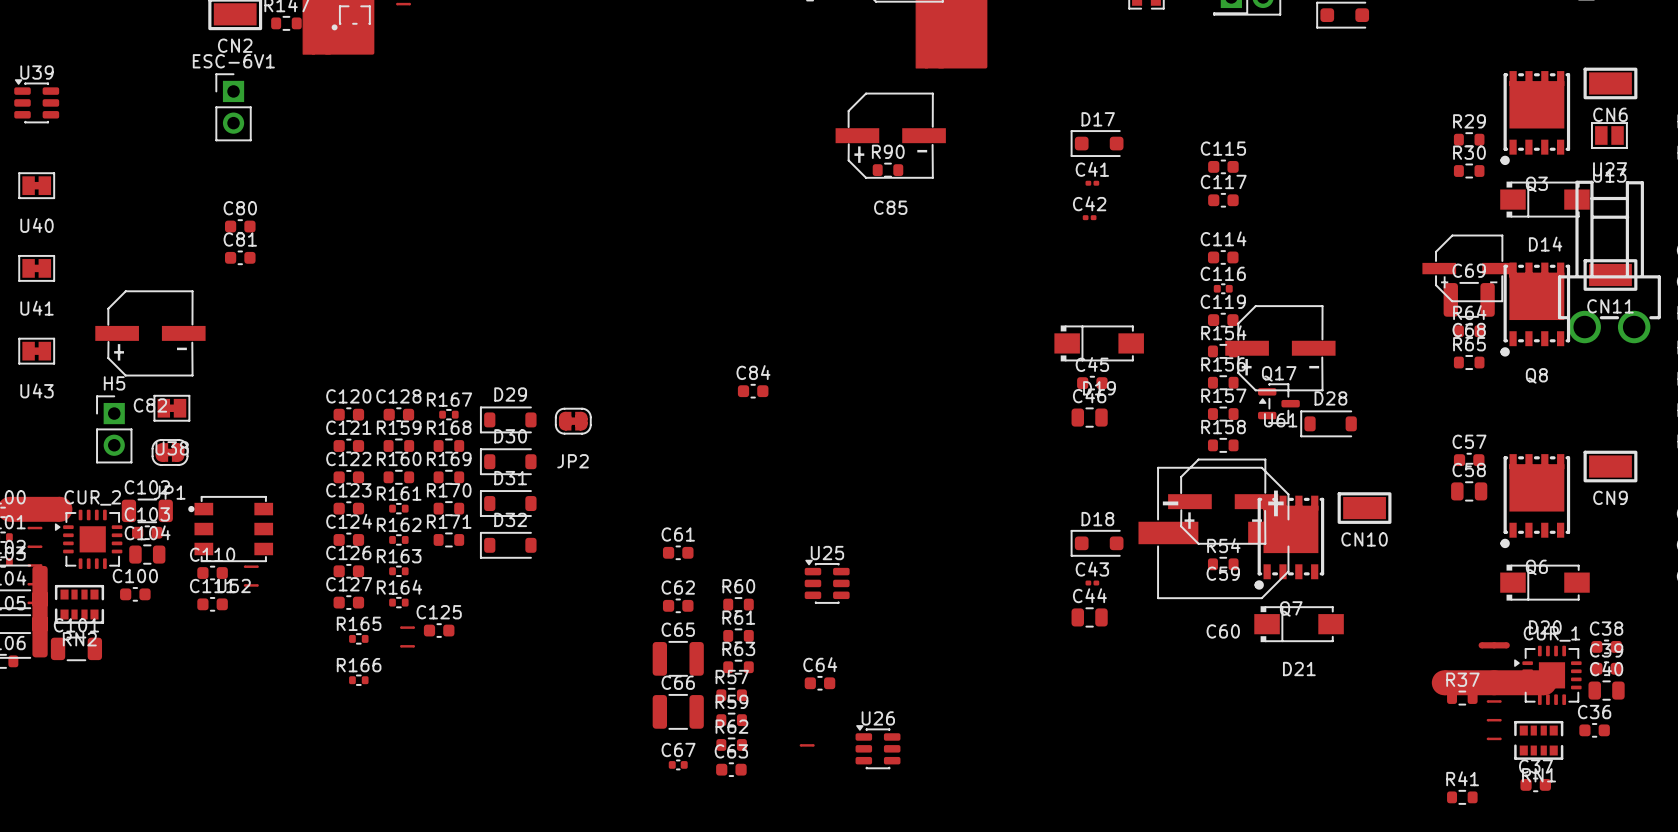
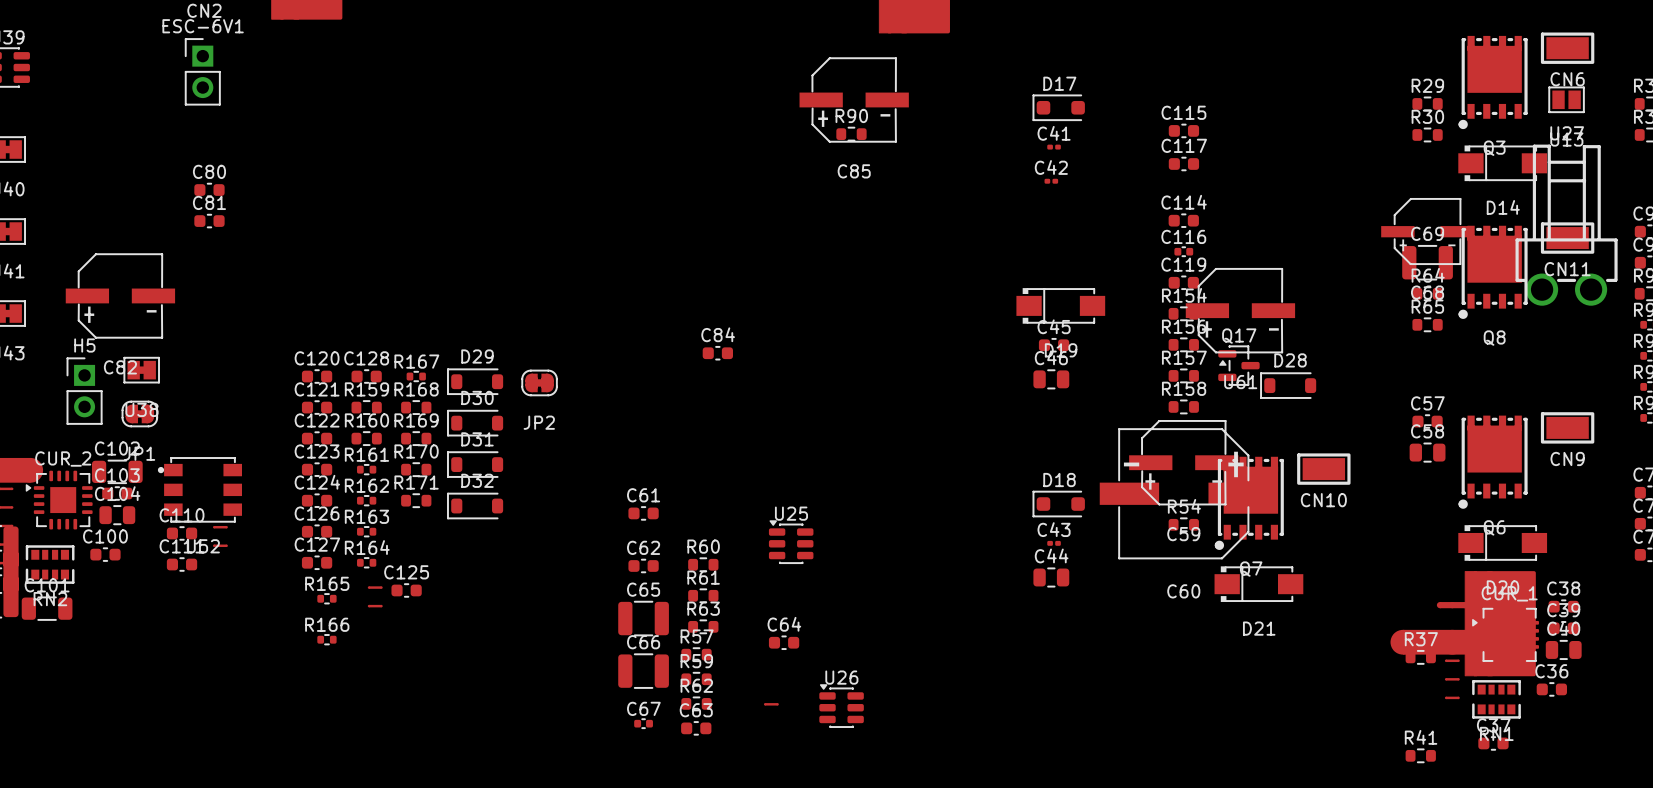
part: none -> (1500, 623)

